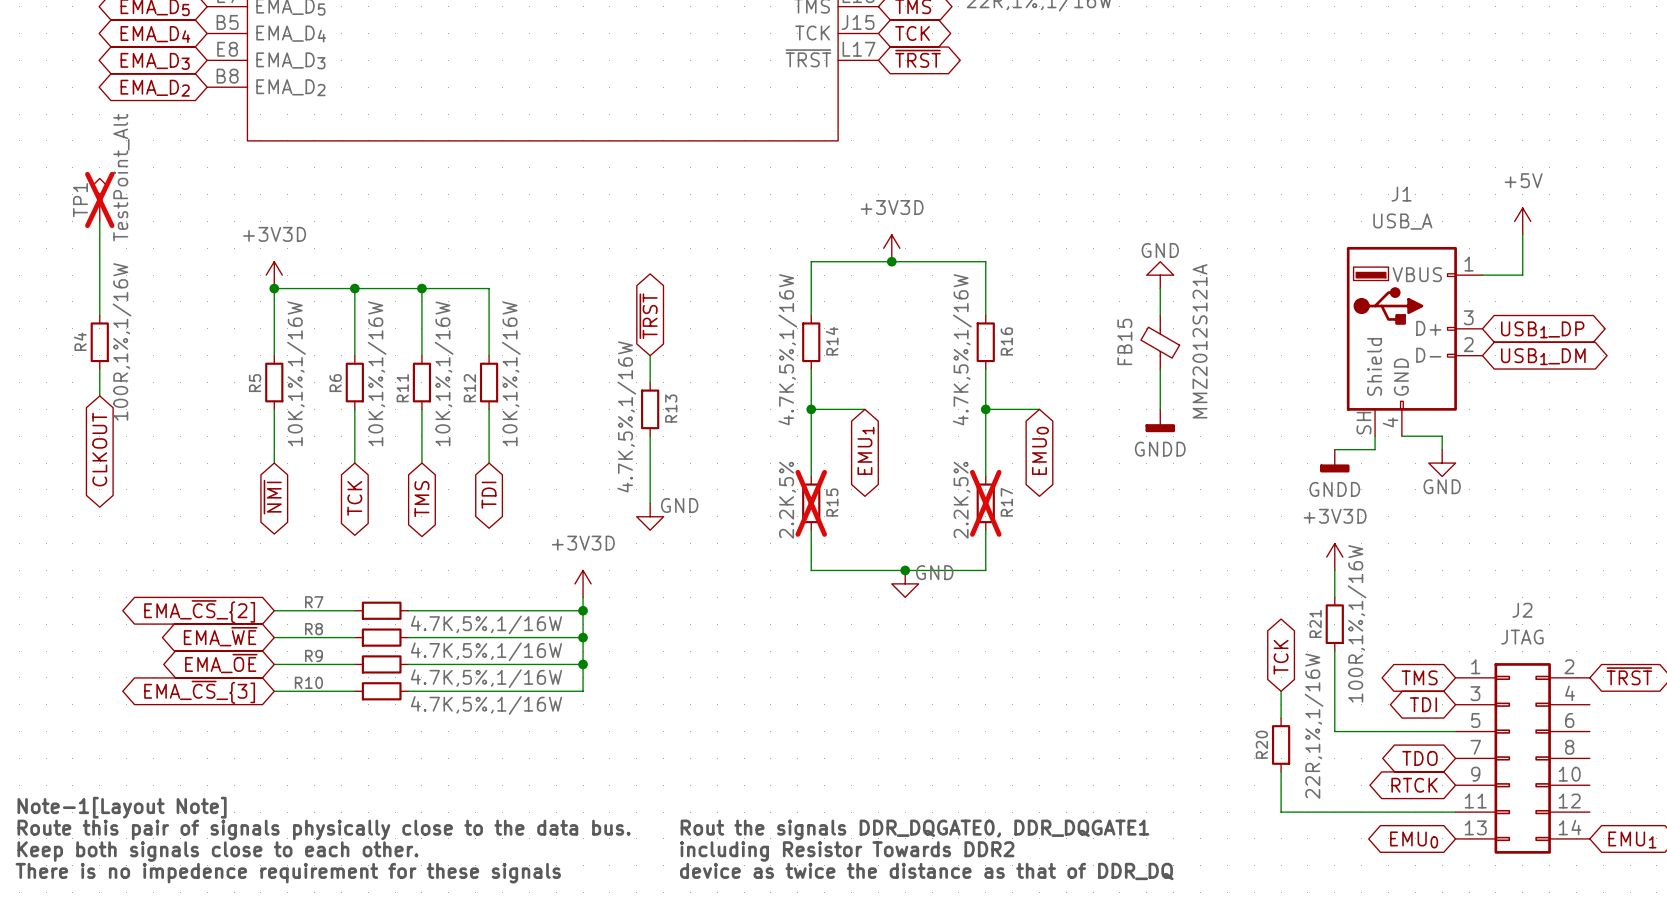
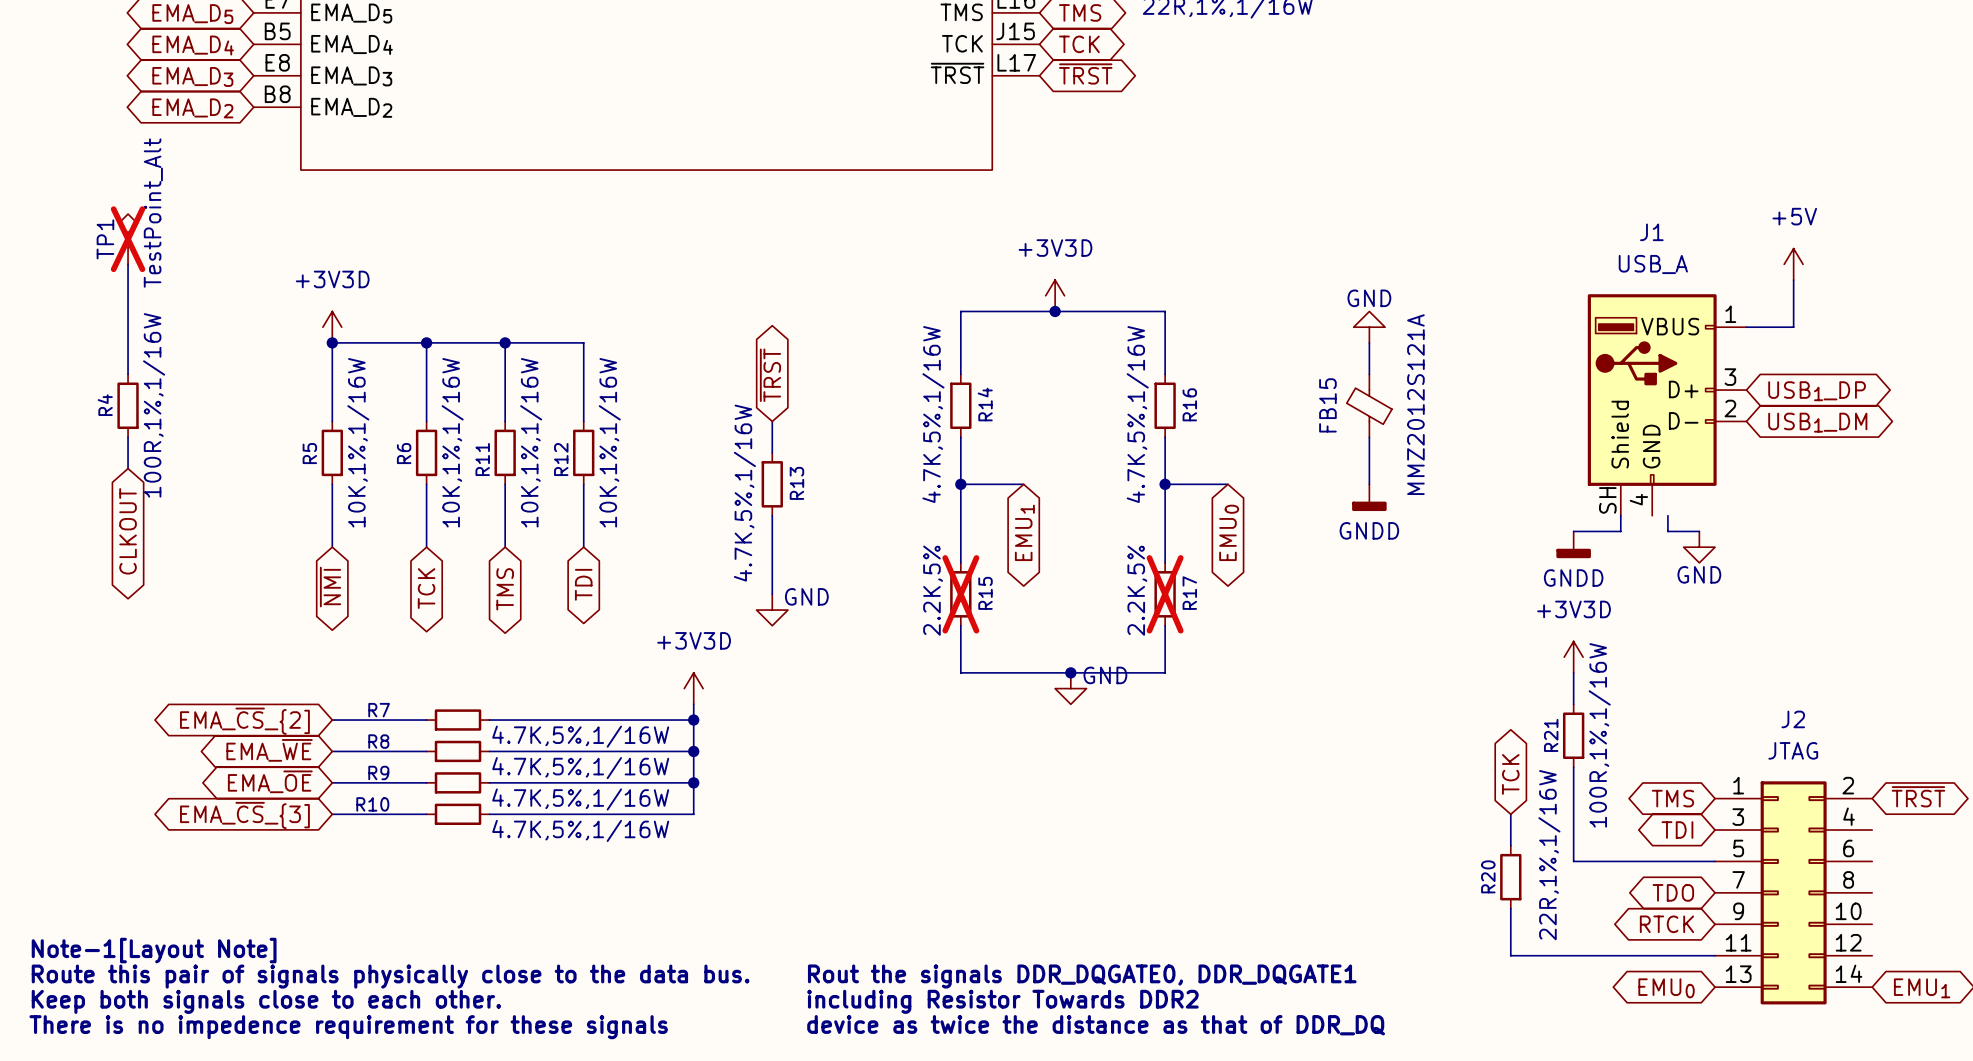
wire: (1401, 436) (1442, 436) (1442, 449) -> (1667, 515) (1667, 531) (1699, 531)

